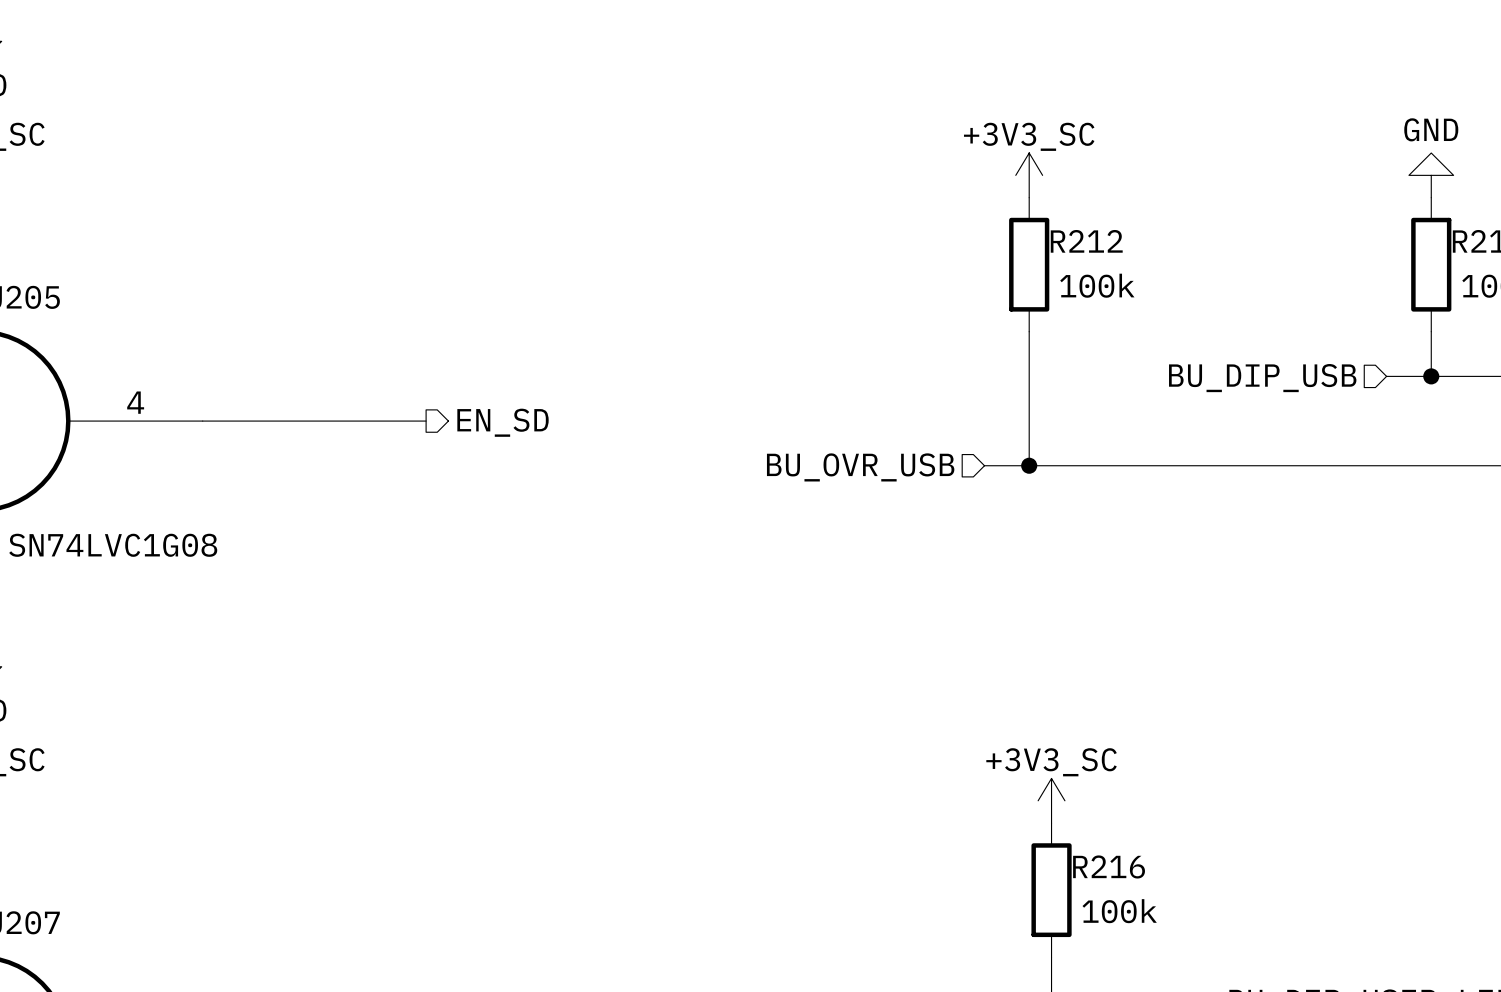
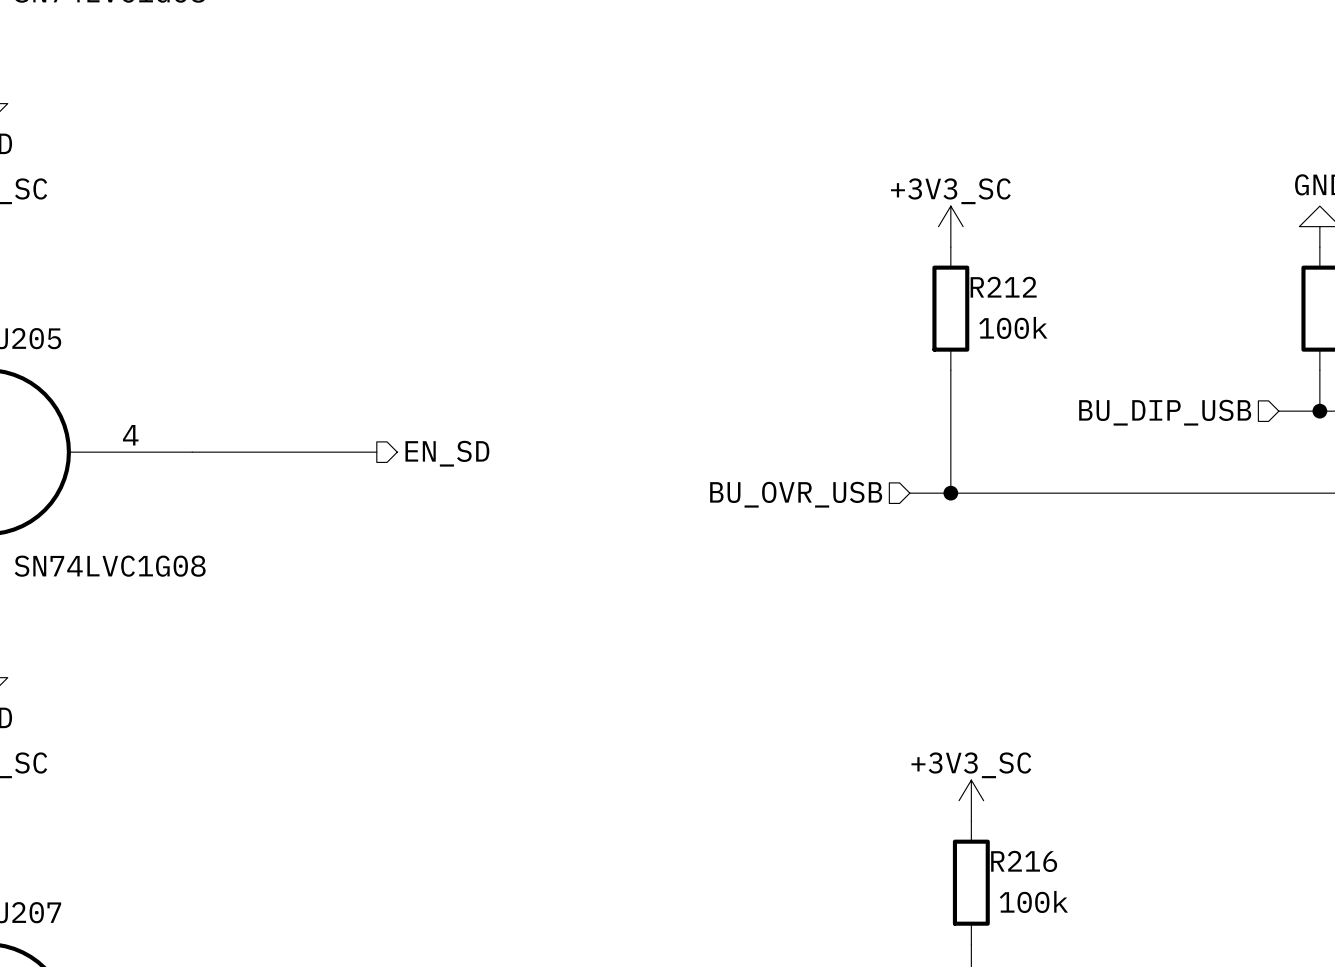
wire: (403, 421) (426, 421) -> none
hierarchical label position: EN_SD (503, 422) -> EN_SD (447, 453)

